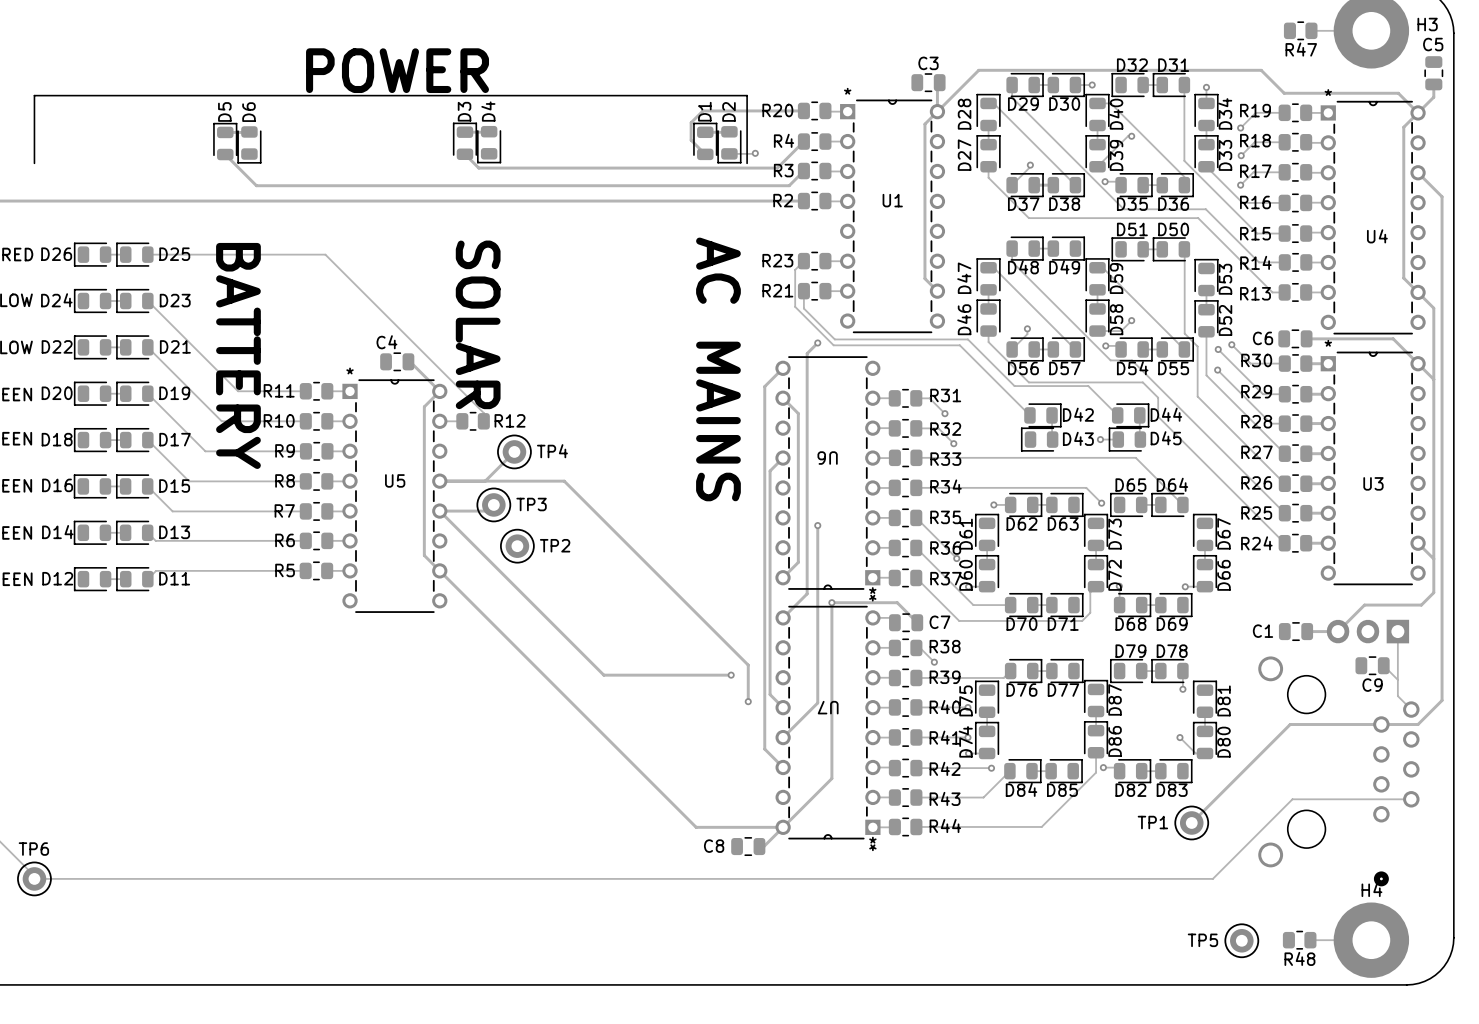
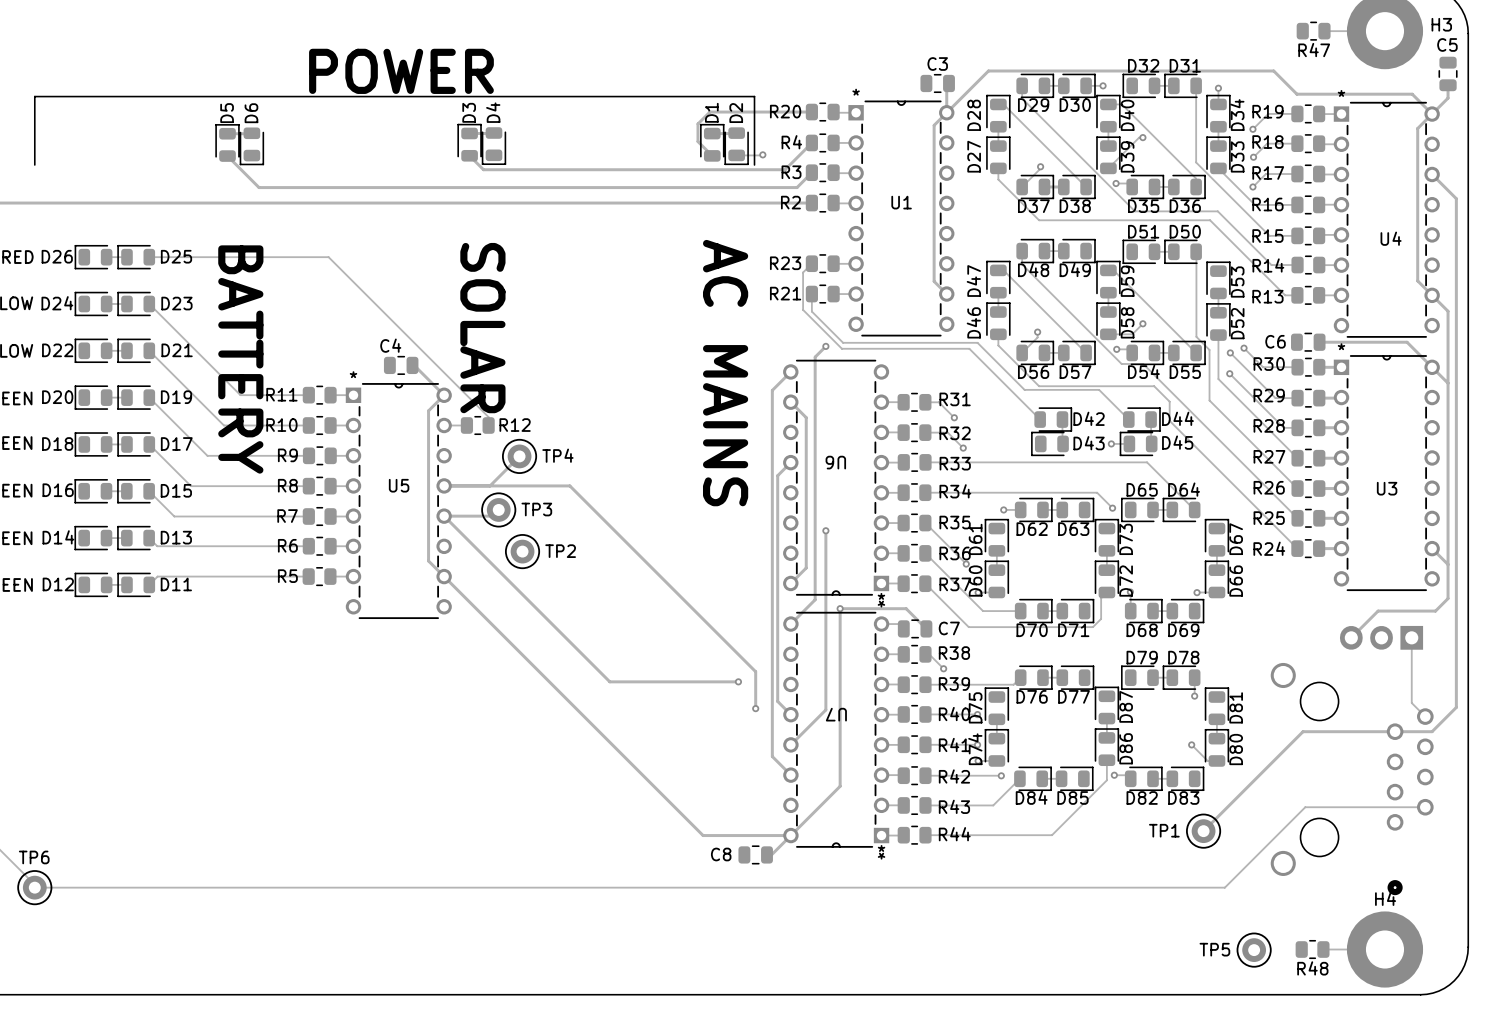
C1: (1295, 631) -> none
track: (1307, 631) (1338, 631) -> none
C9: (1372, 665) -> none
track: (1383, 665) (1397, 679) -> none

